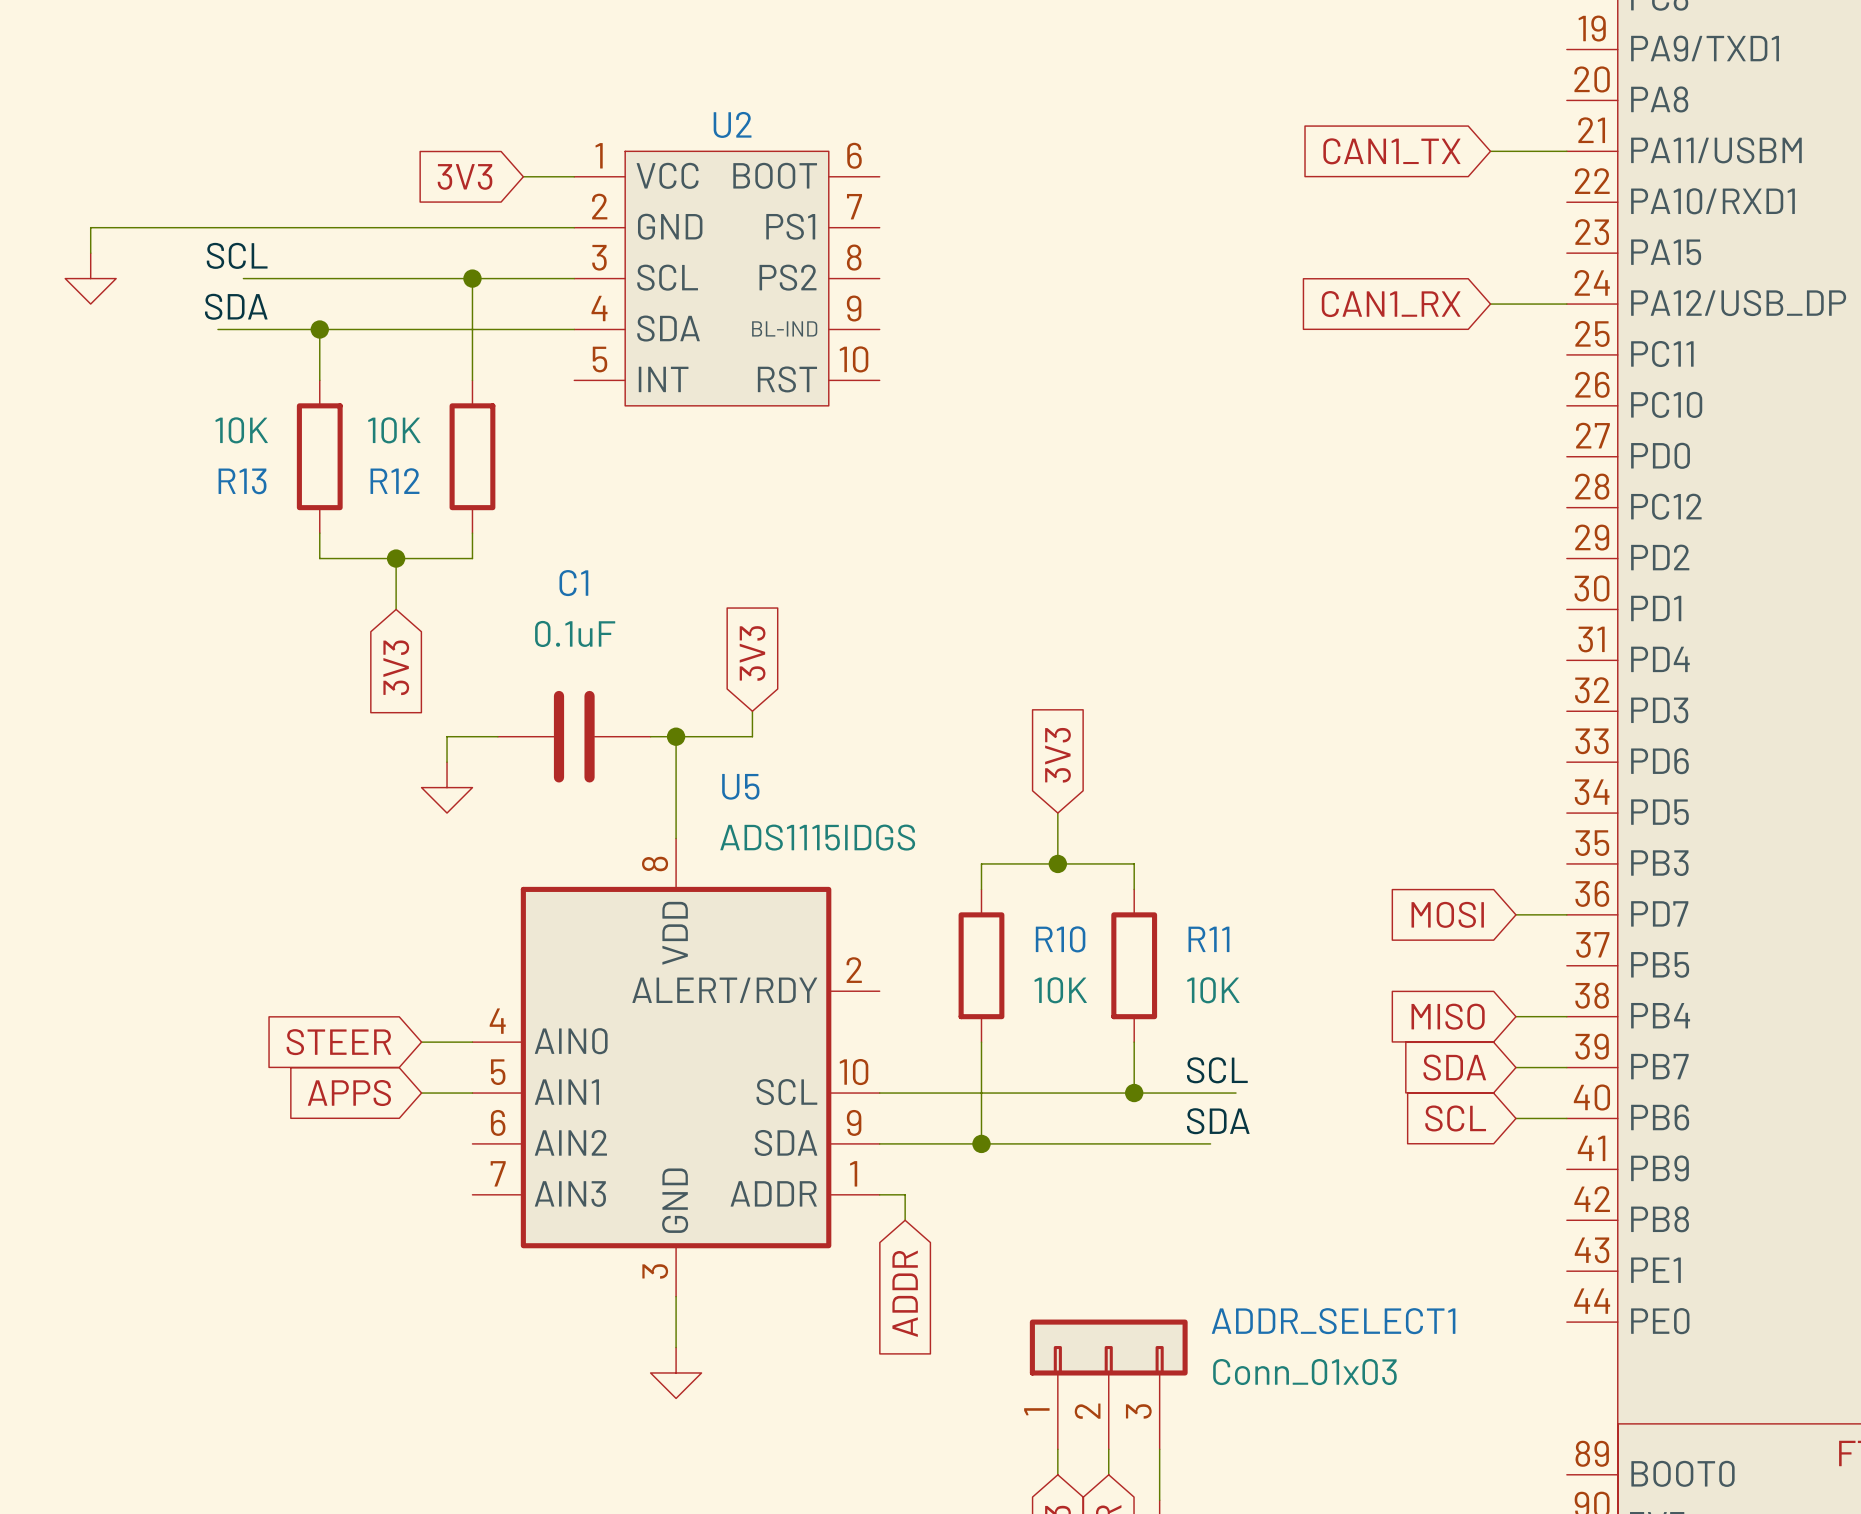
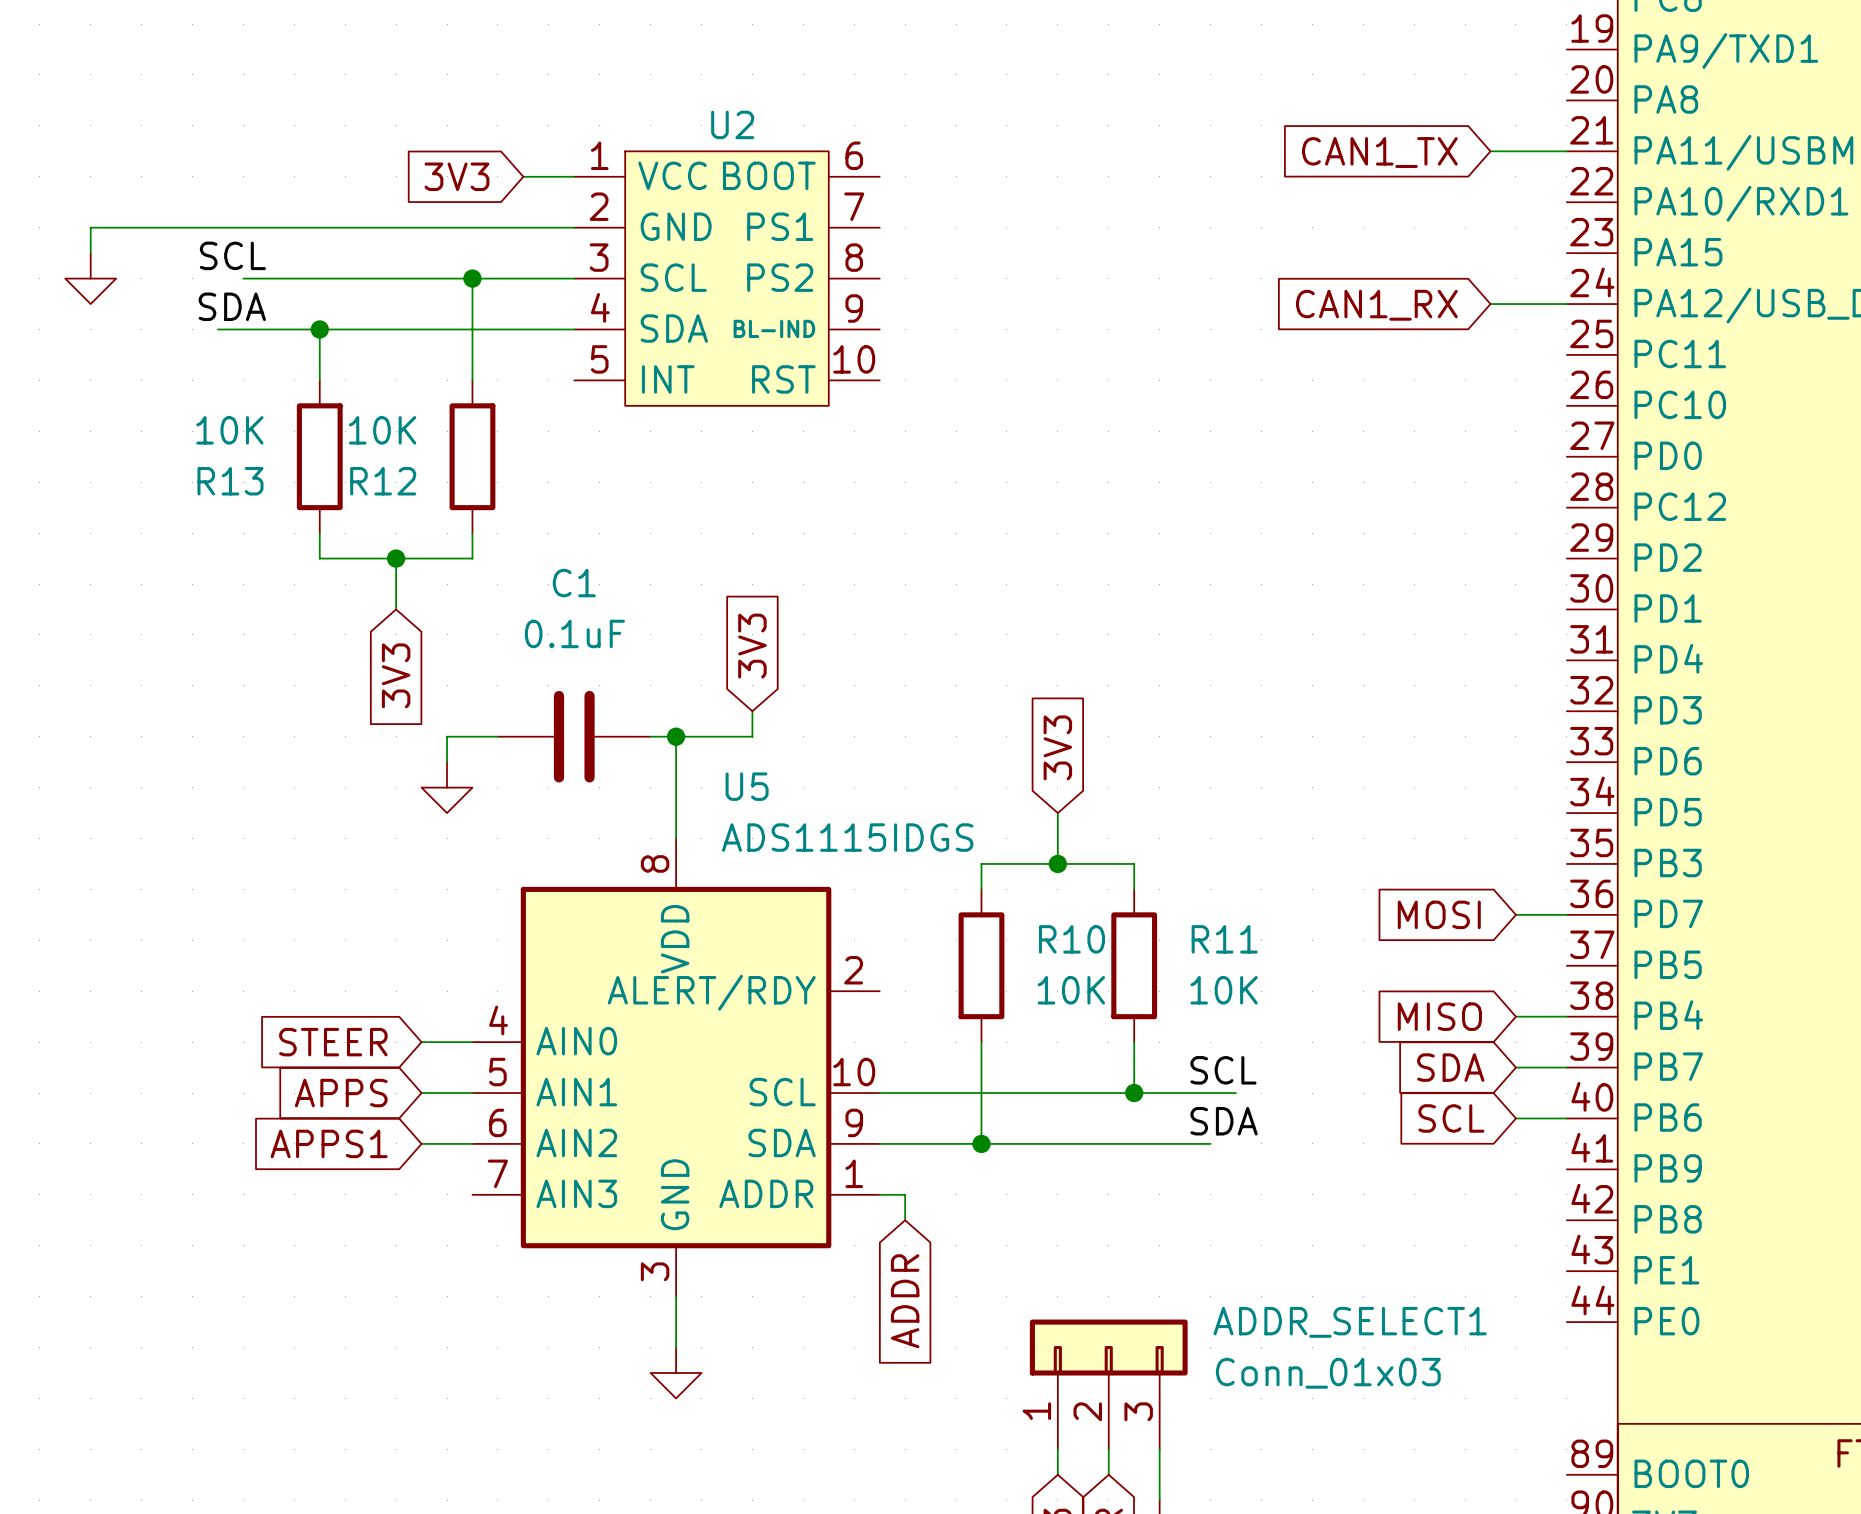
global label: none -> APPS1 (329, 1143)
wire: none -> (421, 1143) (472, 1143)

